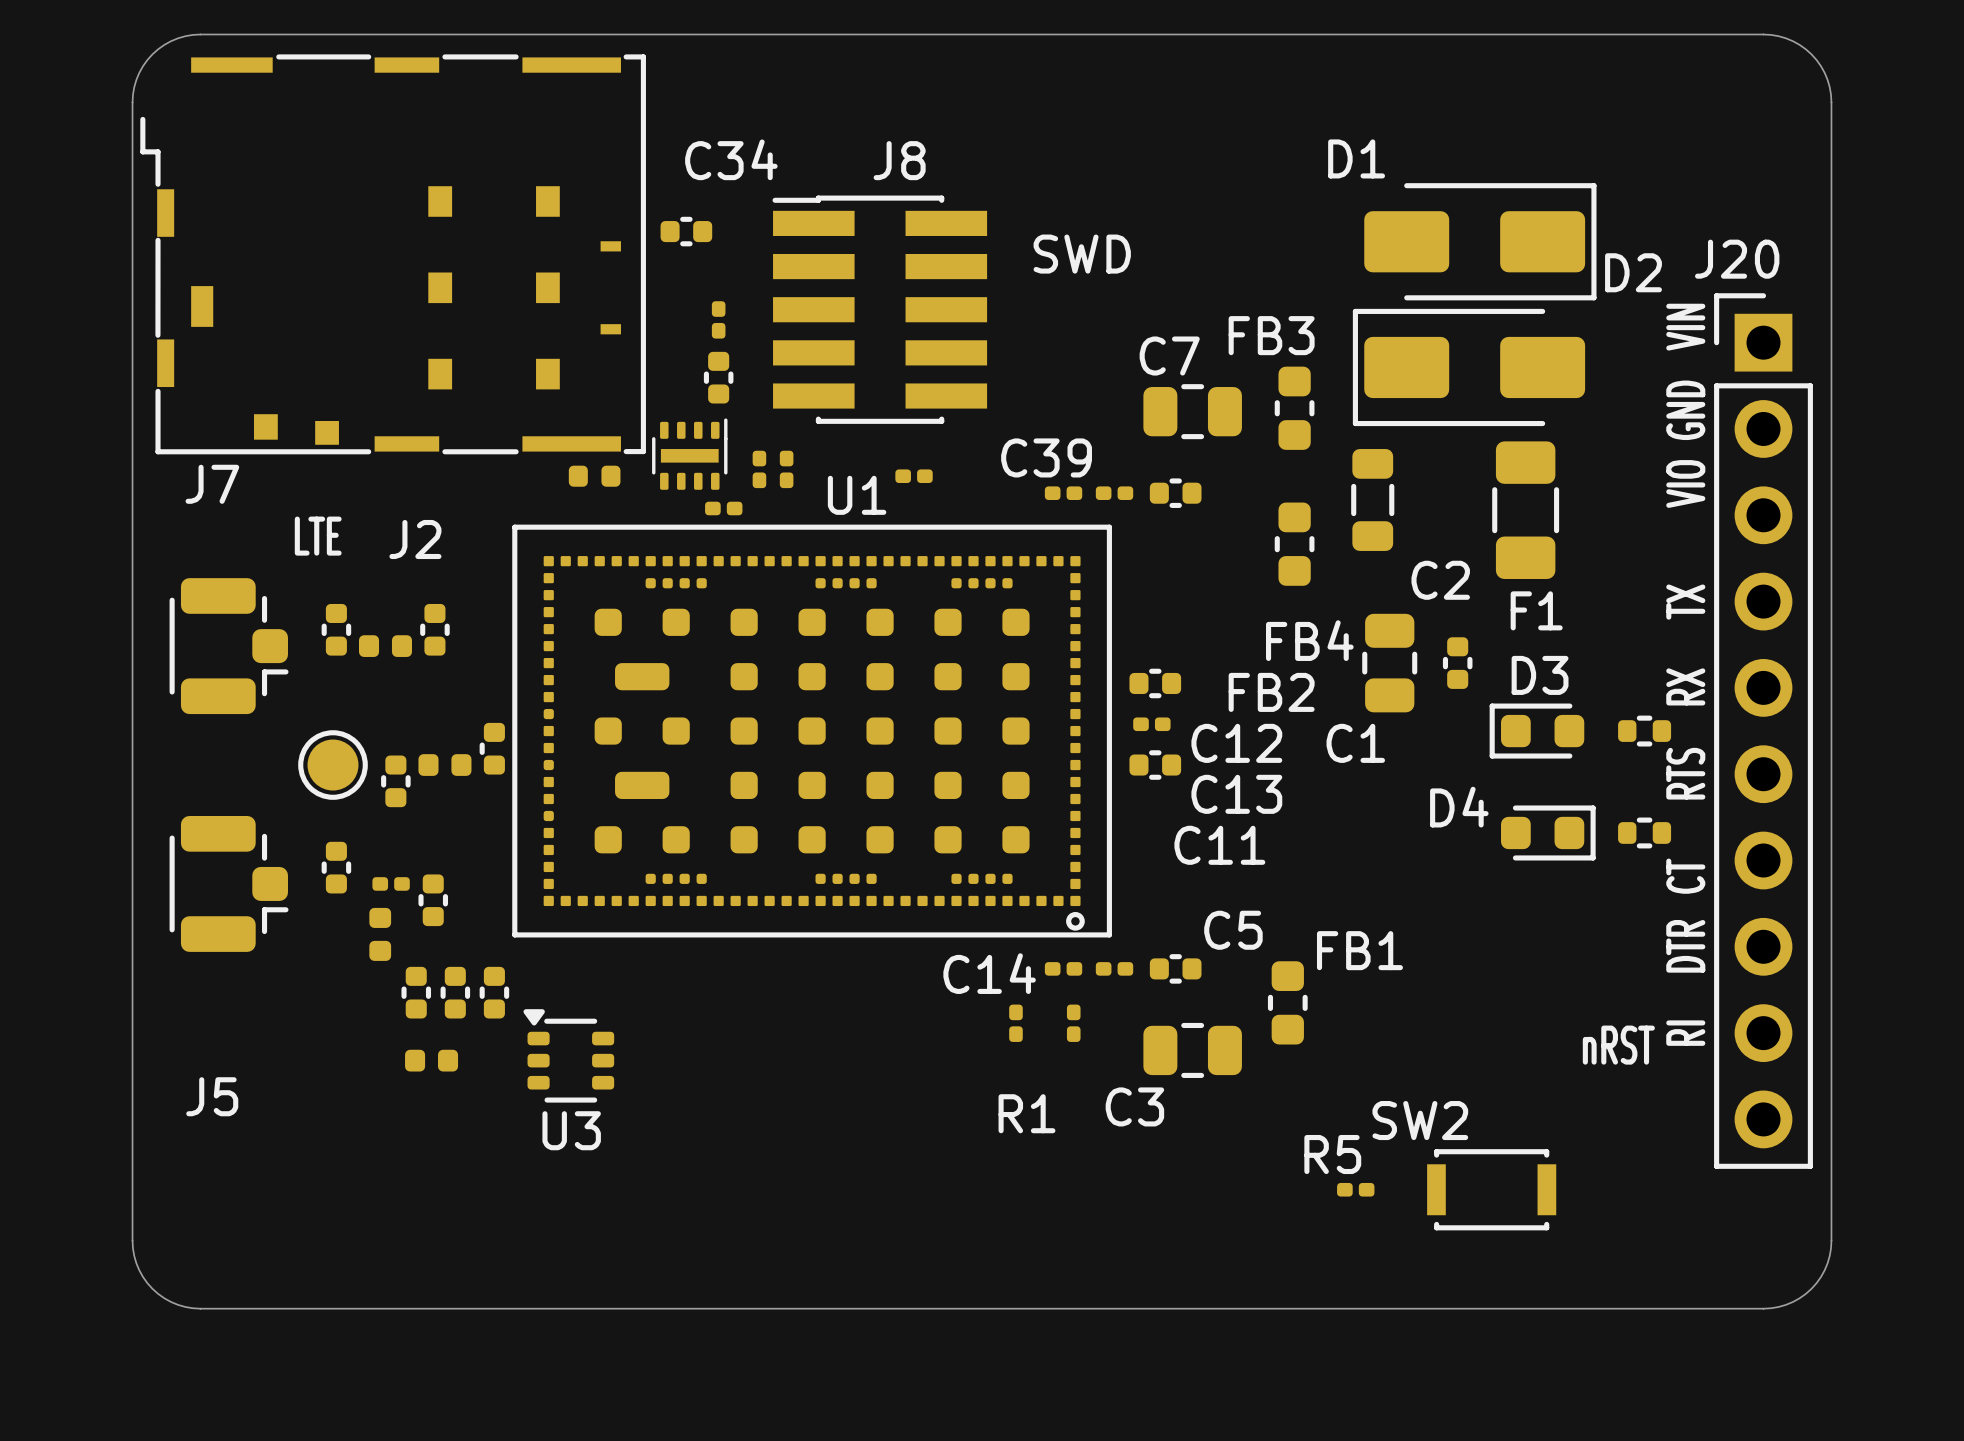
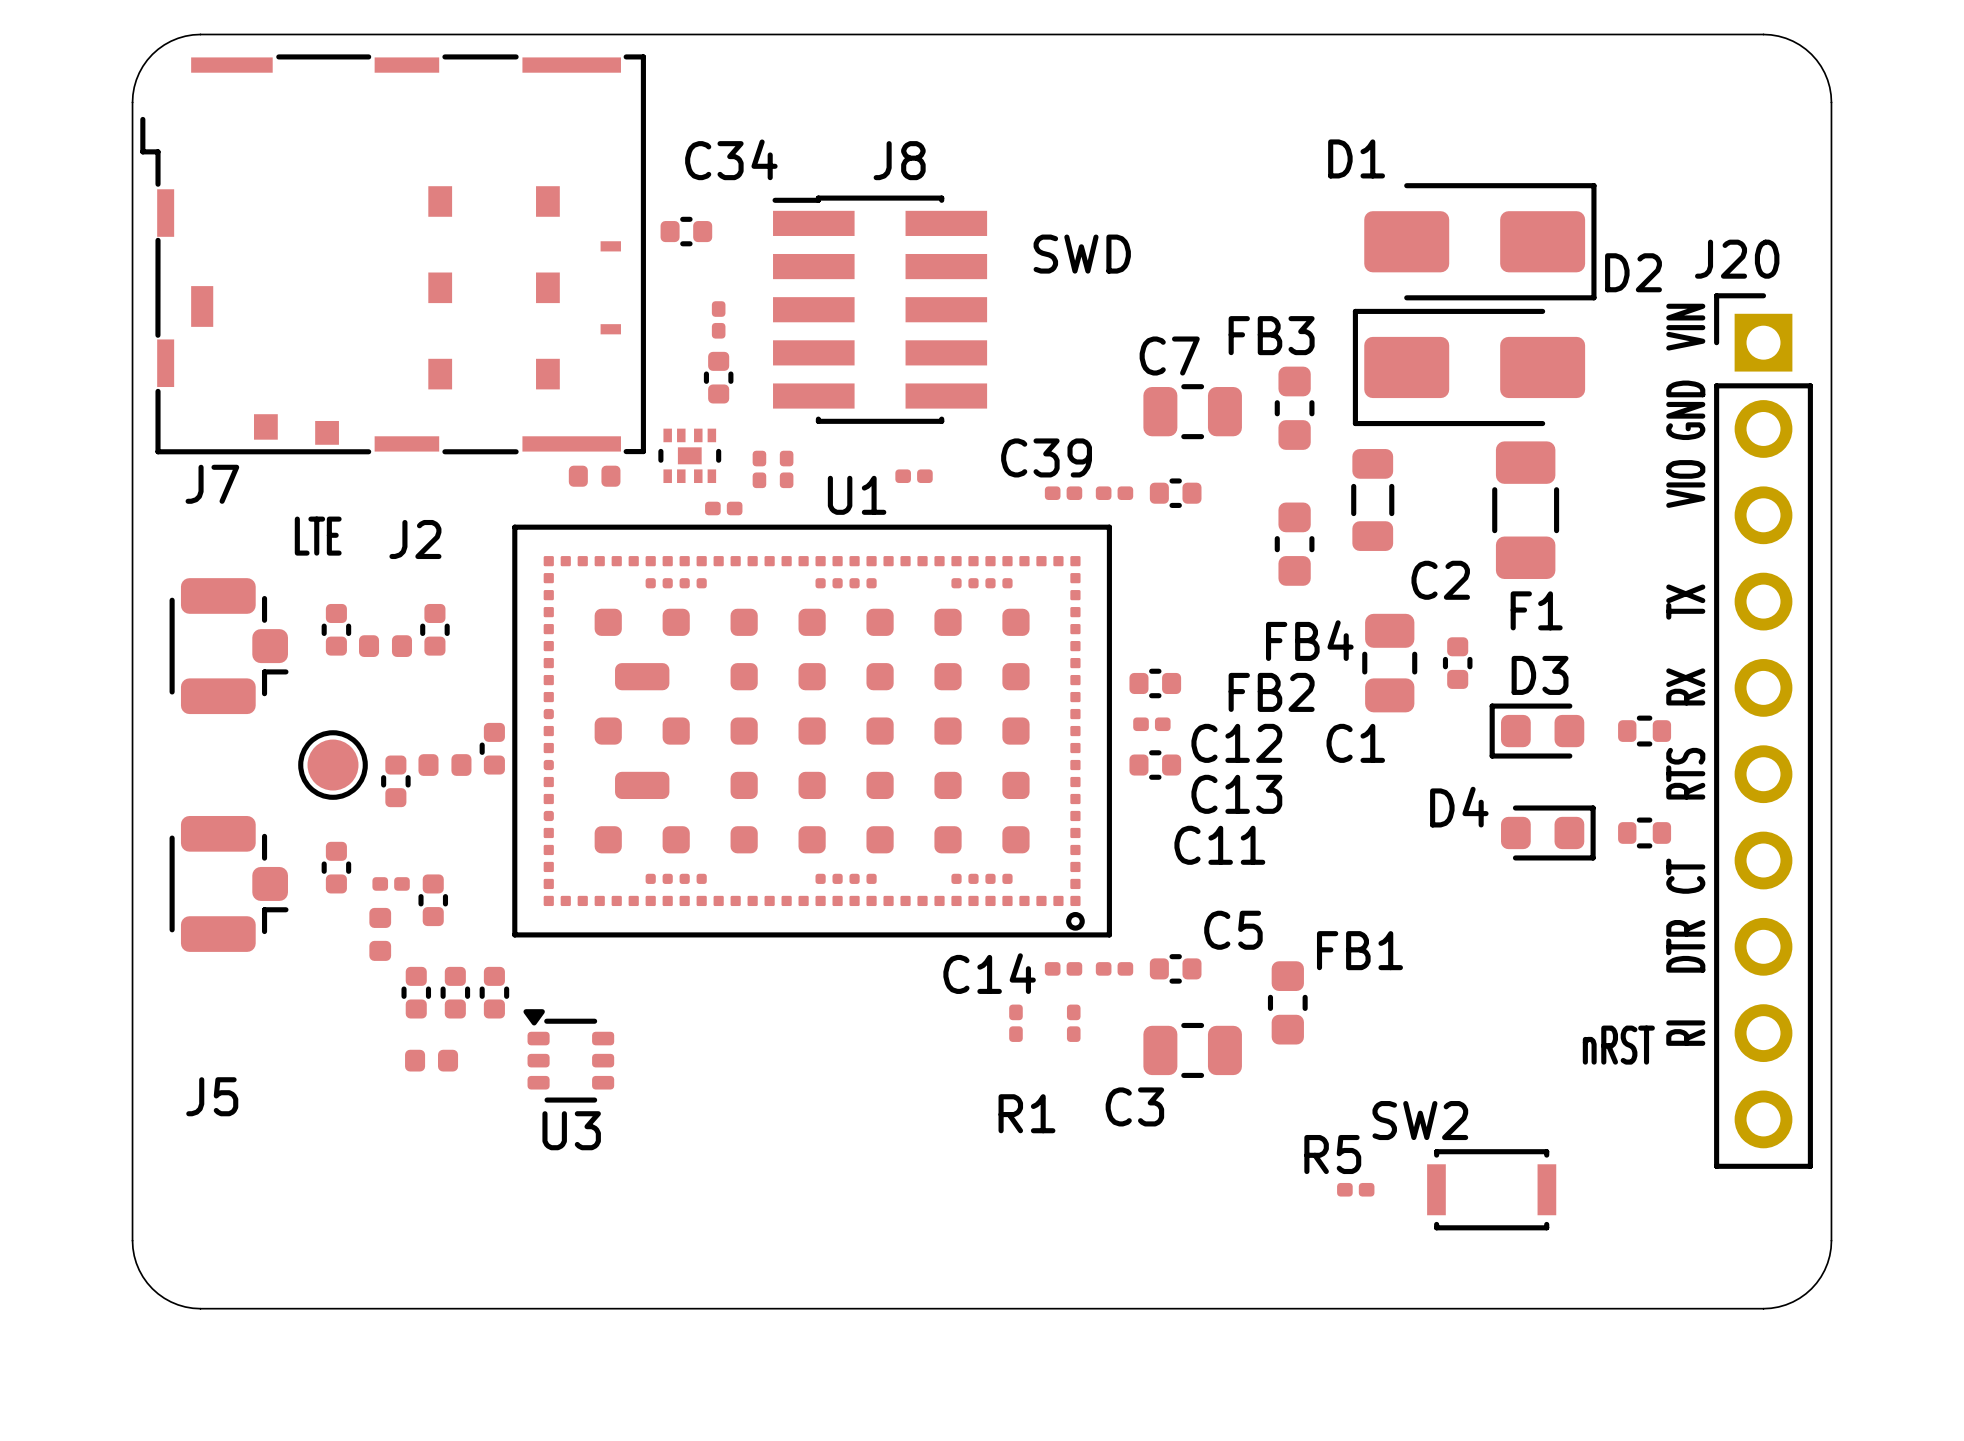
part footprint: [652, 418, 728, 490] -> [658, 428, 722, 484]

